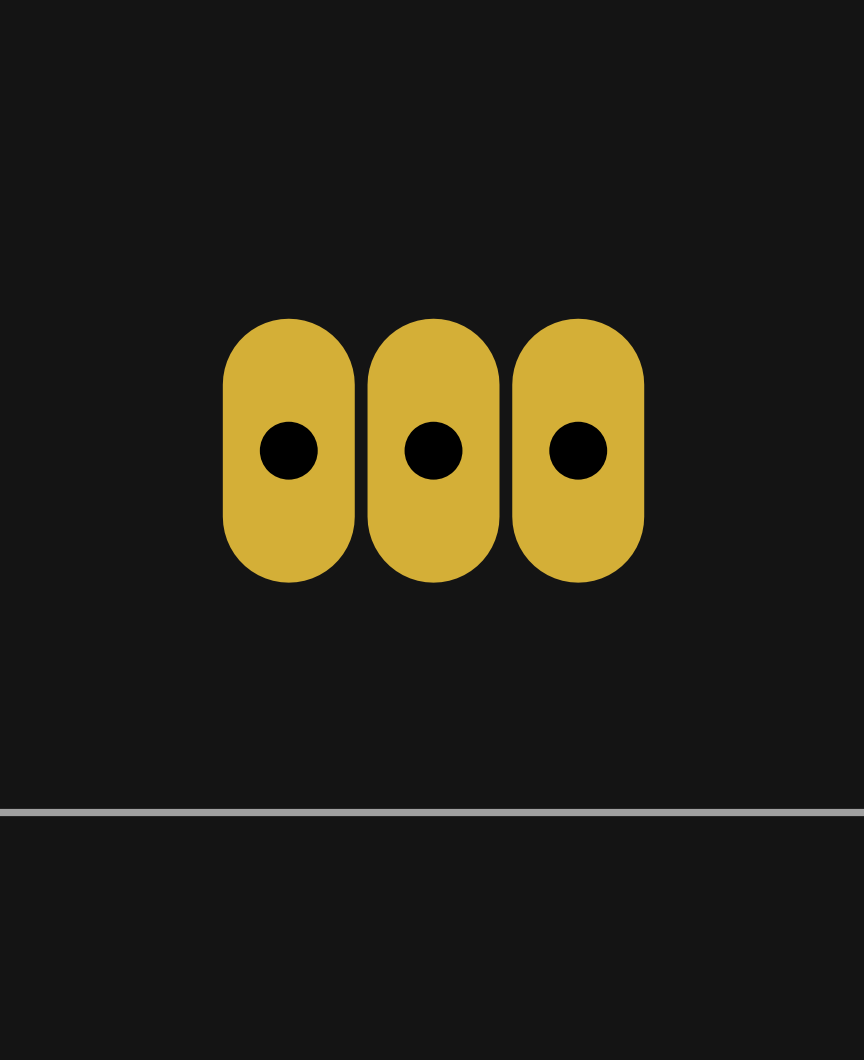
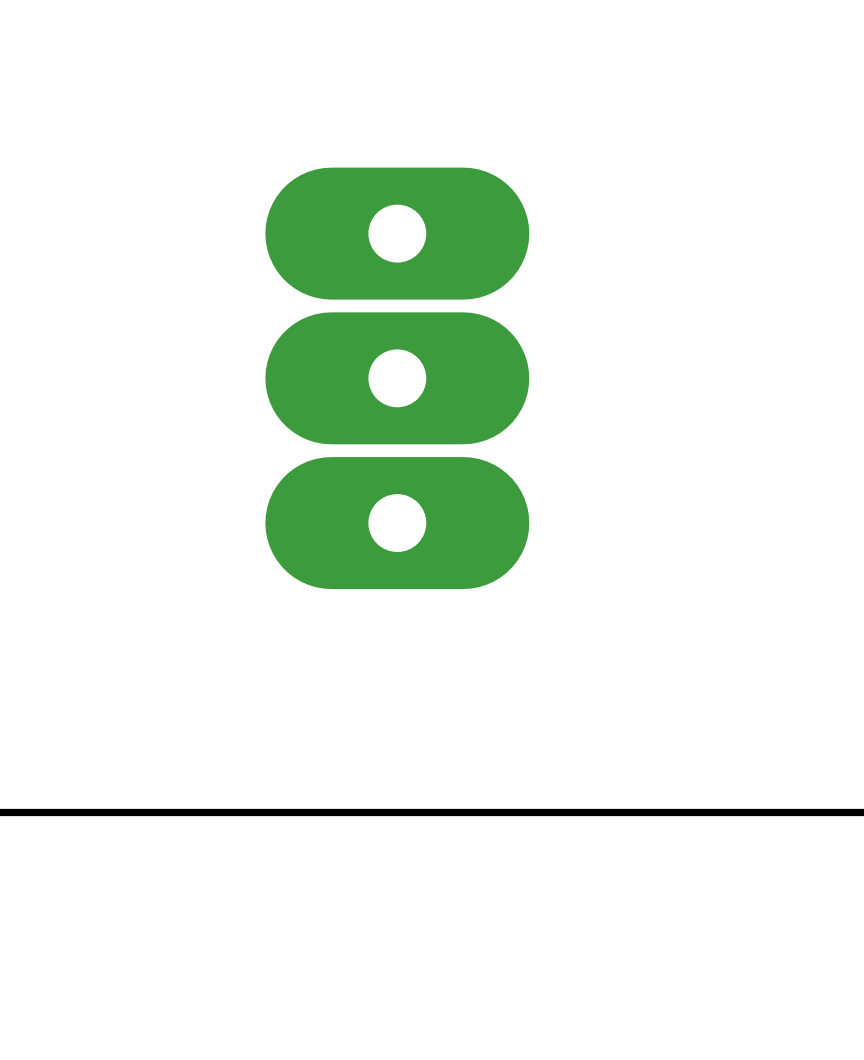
part rotation: 0° (433, 450) -> 90° clockwise (397, 378)

